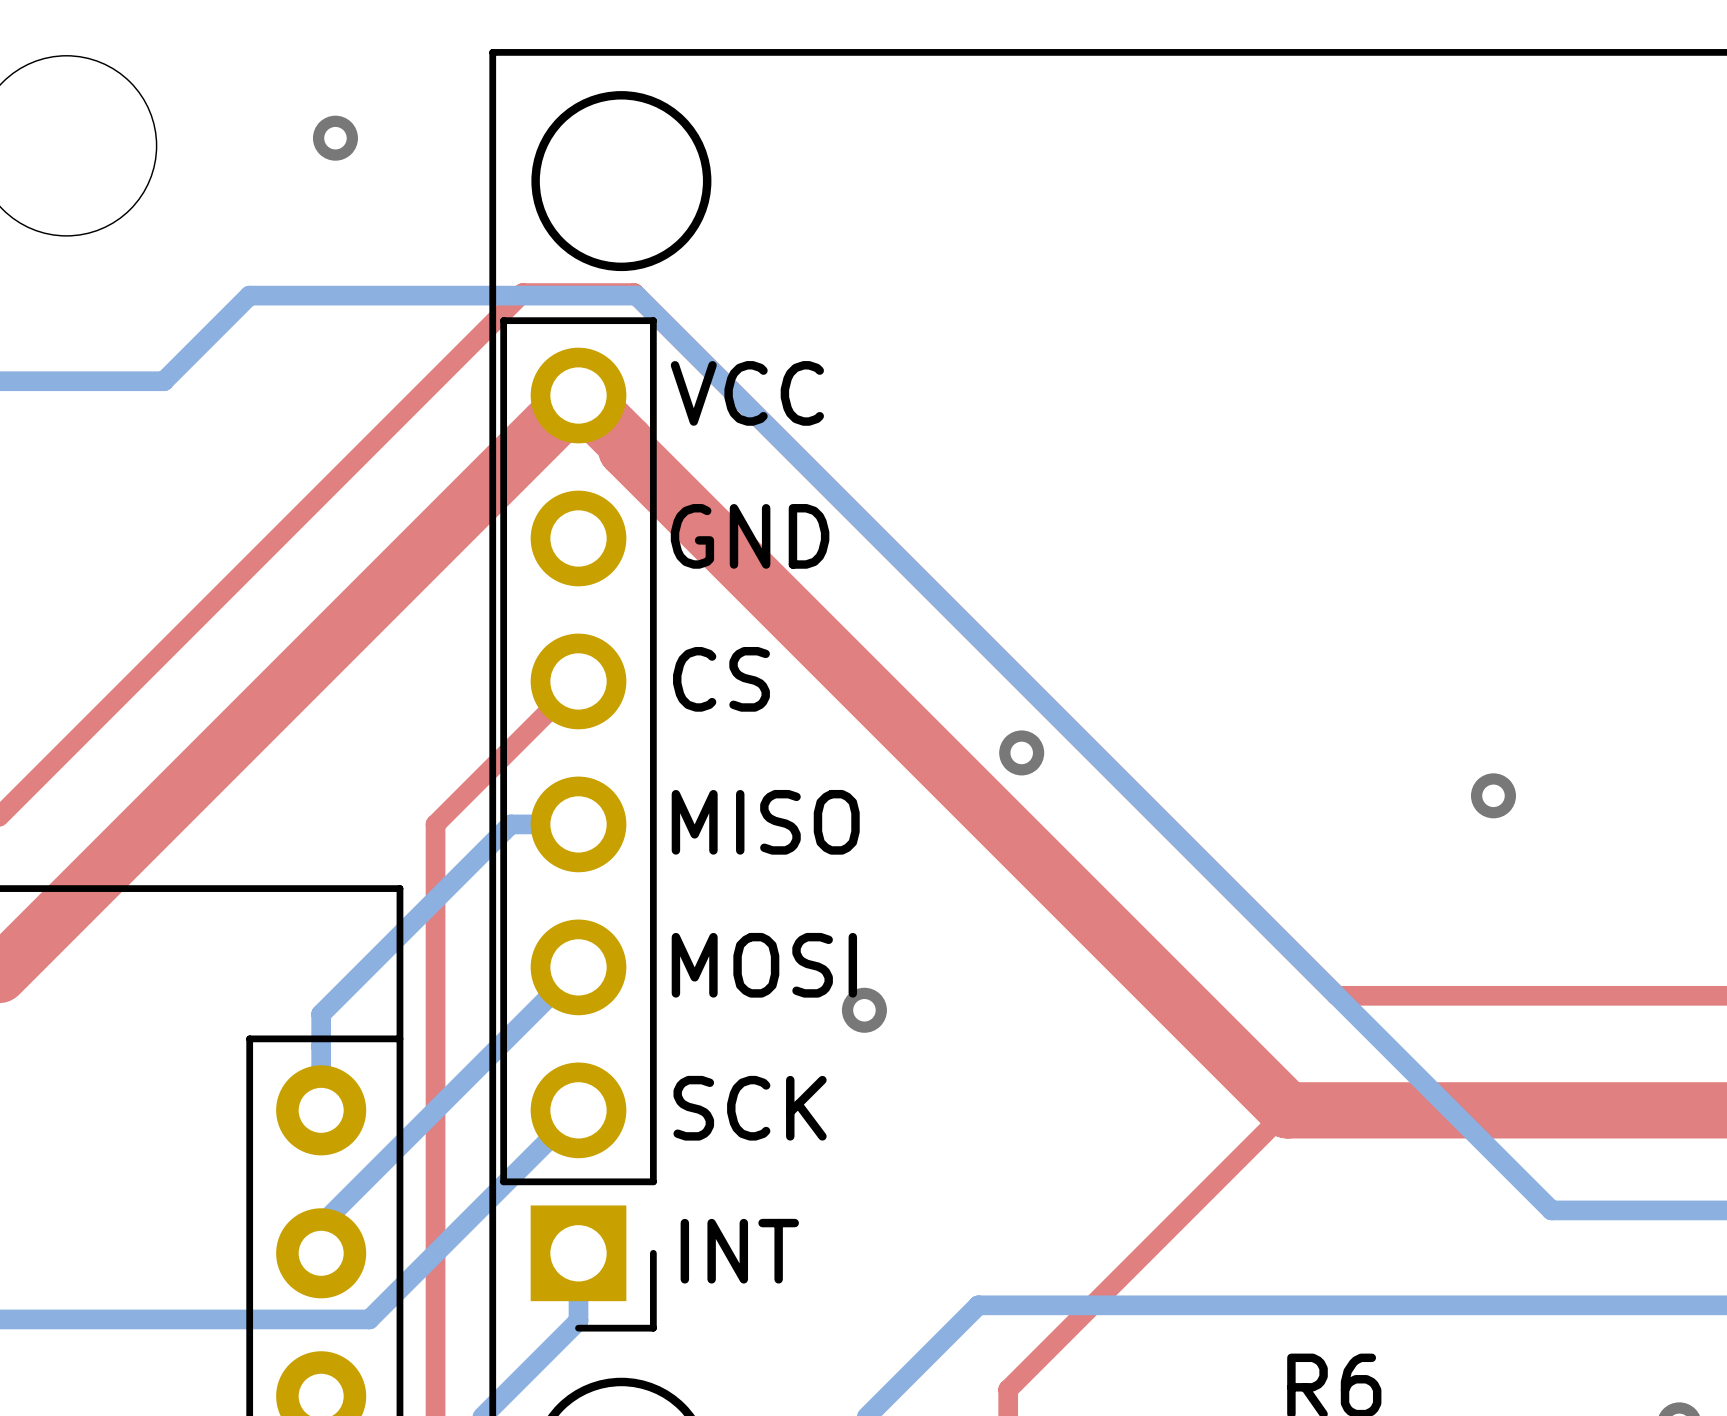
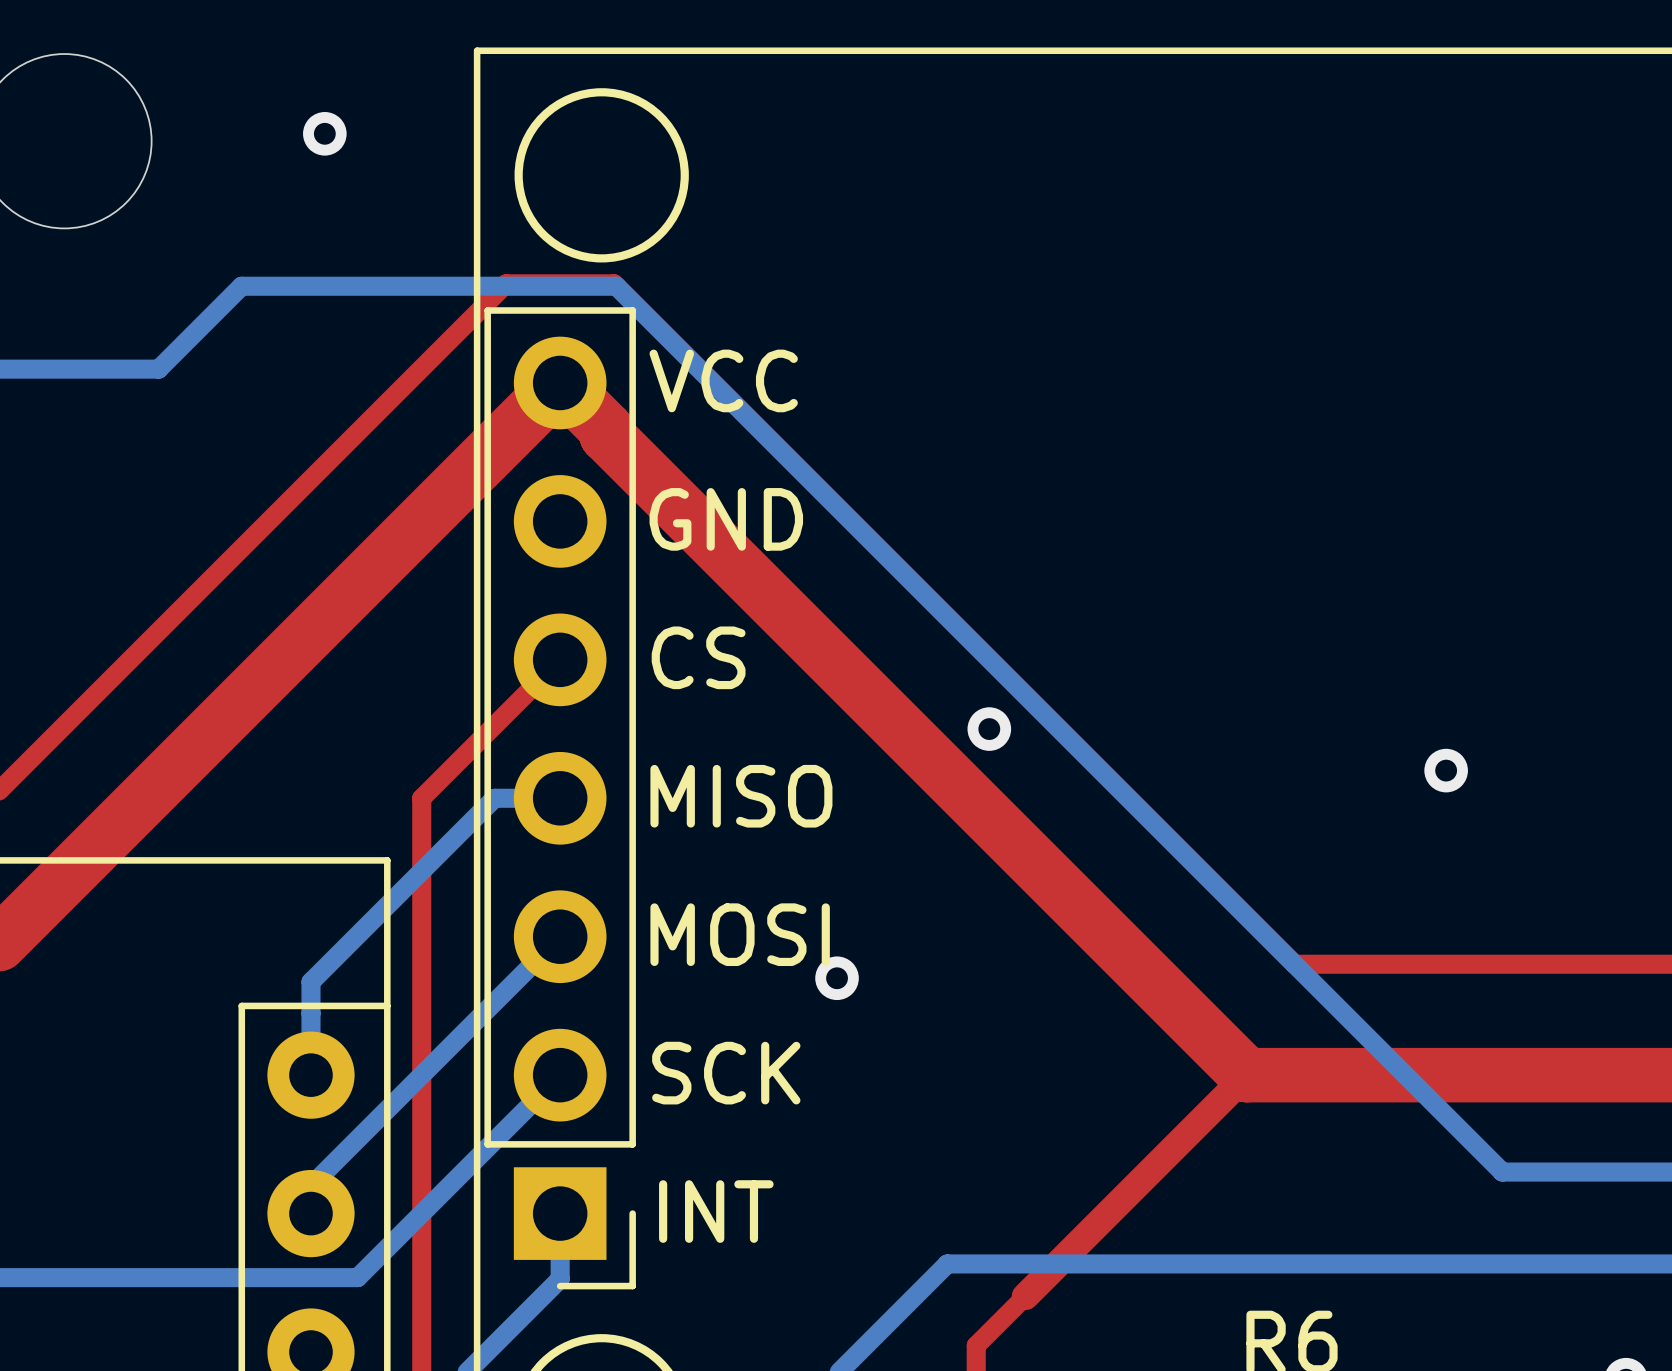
top track width: thin (1287, 1110) (1058, 1338) -> thick (1246, 1075) (1025, 1296)

